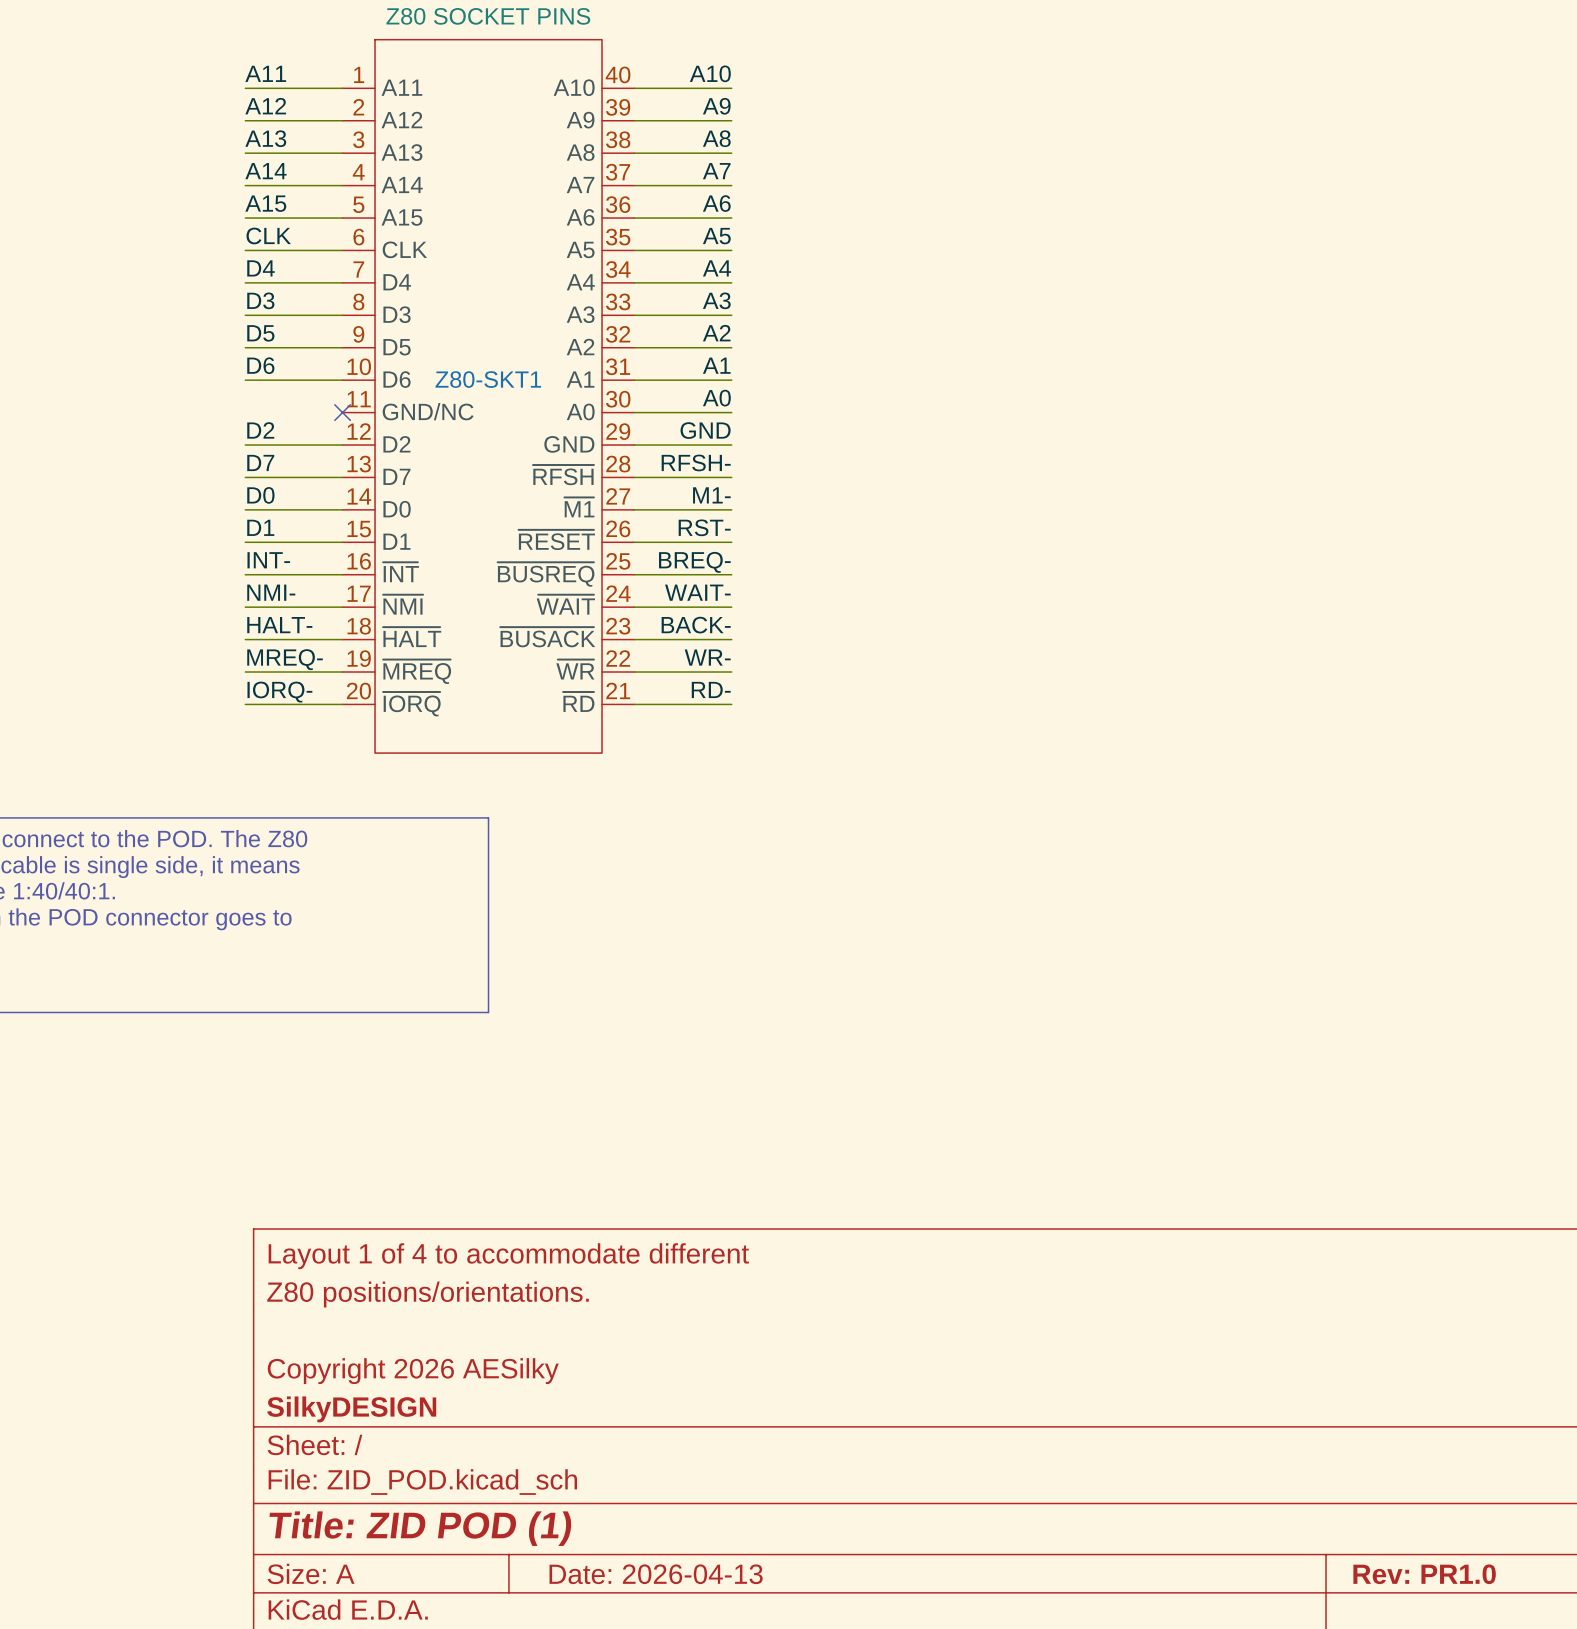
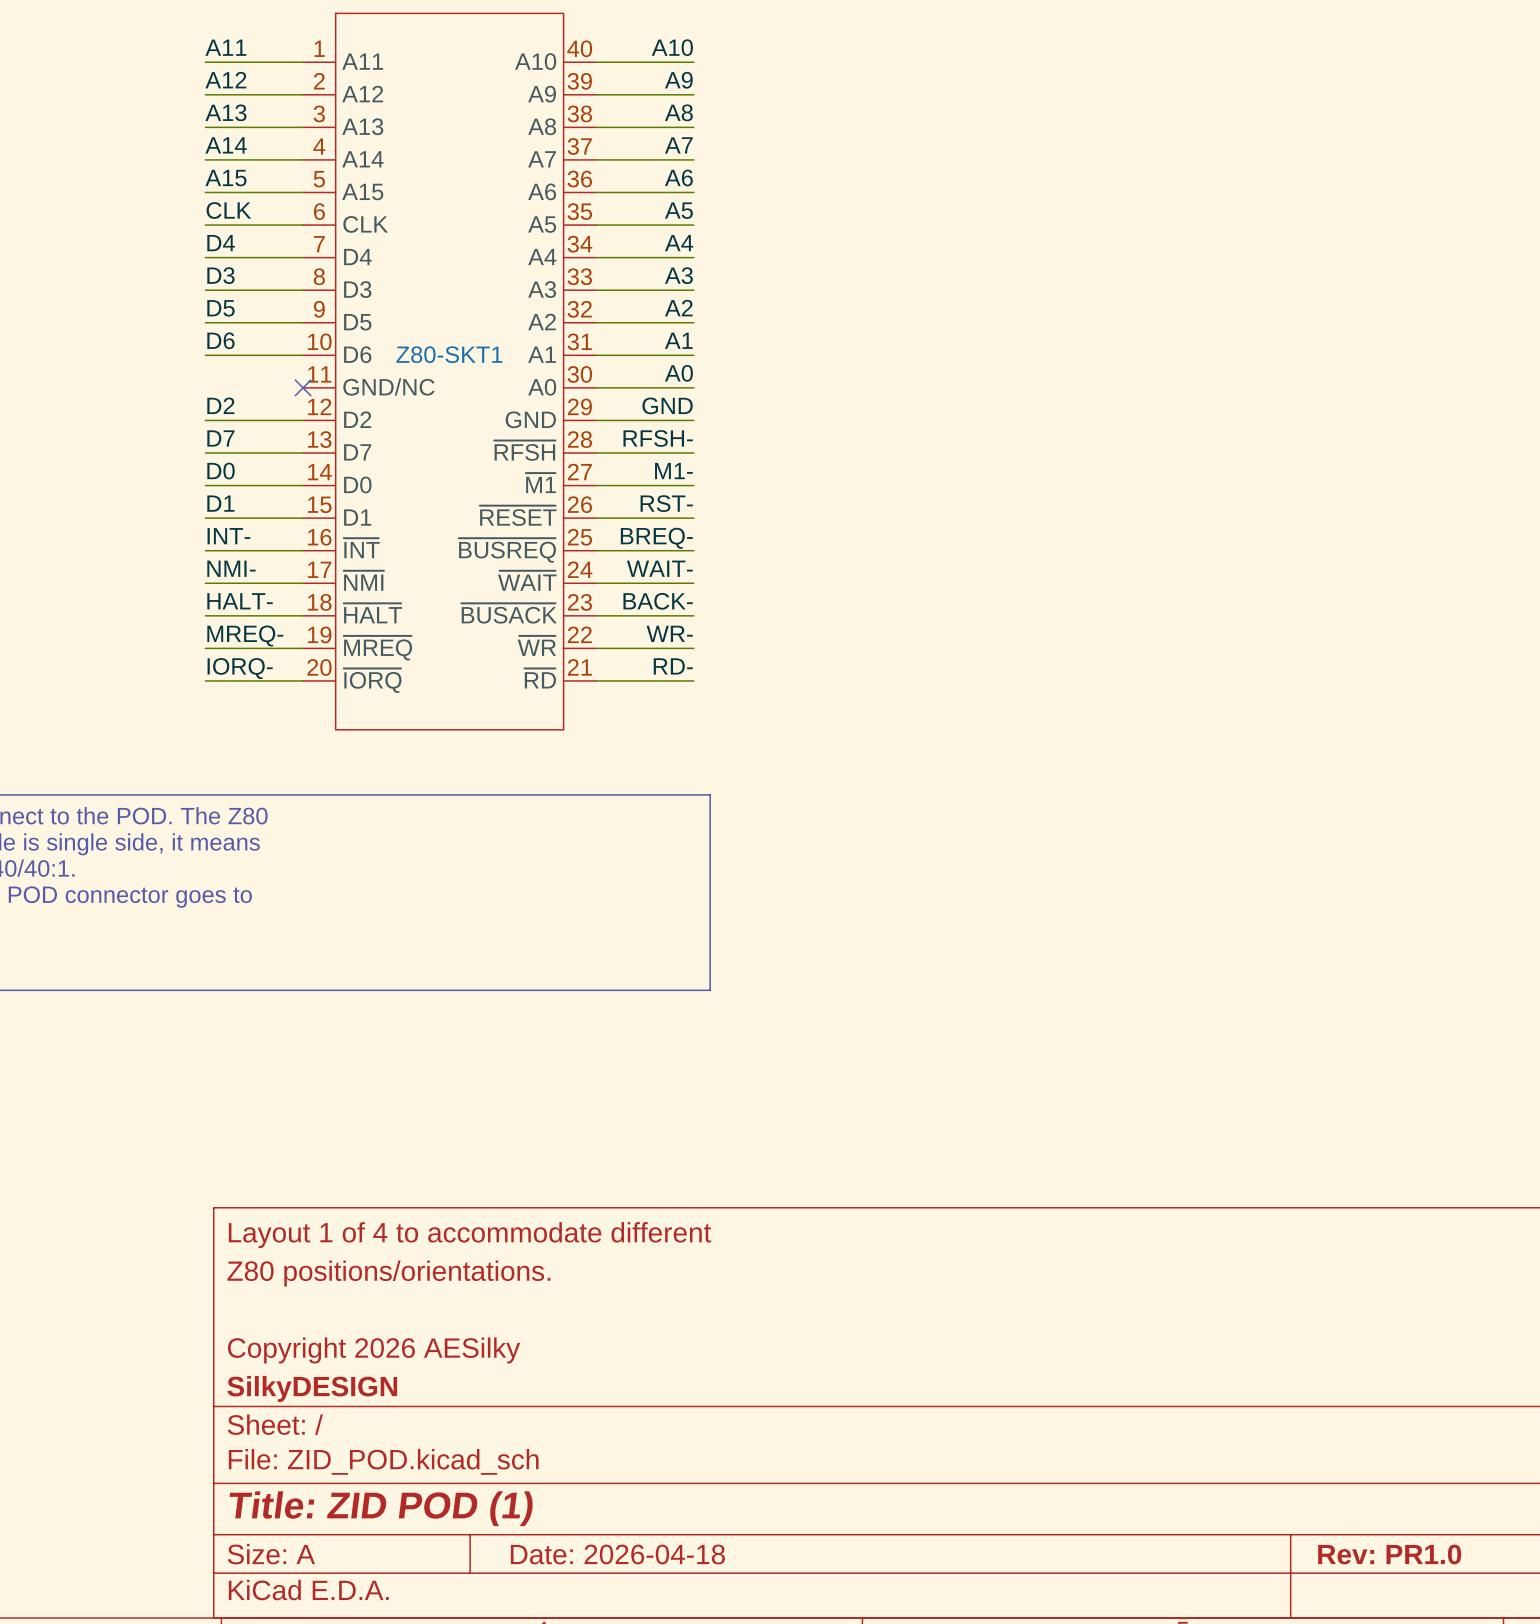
line: (488, 817) (488, 1012) -> (449, 794) (710, 794) (710, 990) (449, 990)
title block: Date: 2026-04-13 (656, 1574) -> Date: 2026-04-18 (617, 1554)

